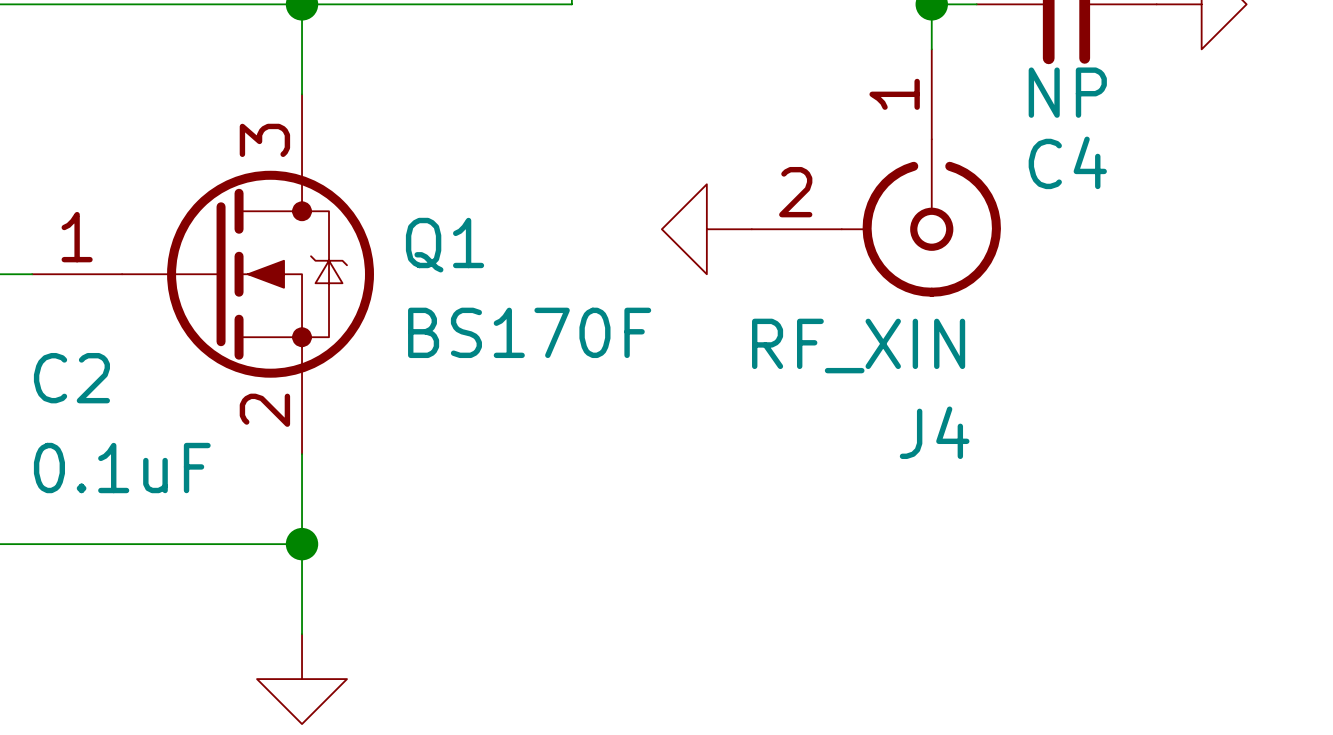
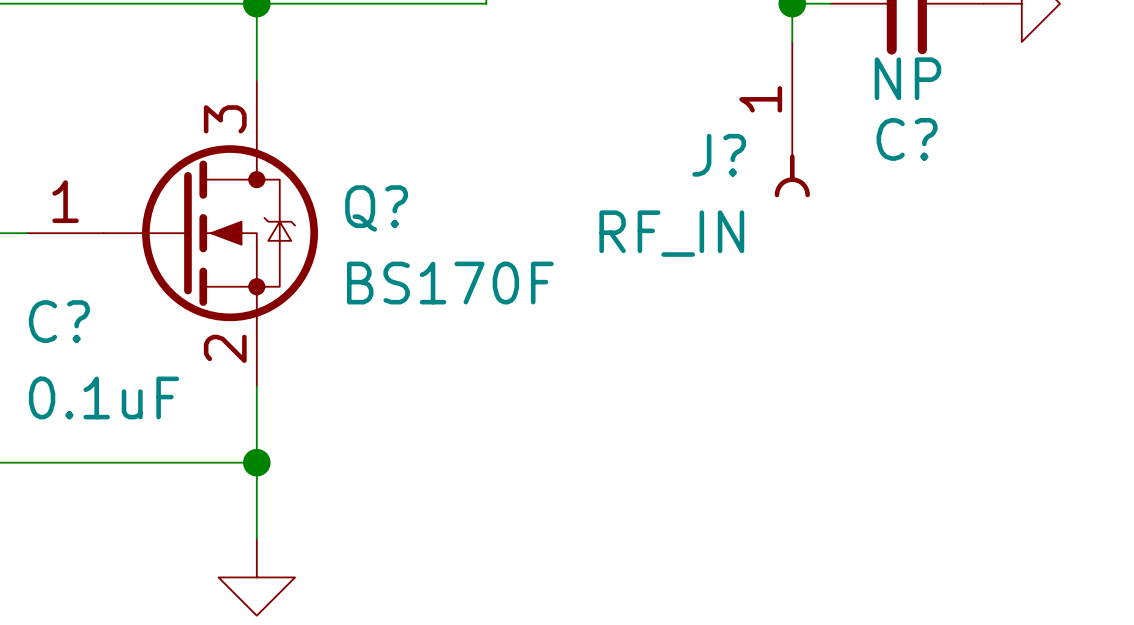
J?: none -> RF_IN (792, 119)
C4 name: C4 (1067, 162) -> C? (907, 139)
J4: RF_XIN (876, 173) -> none
power symbol: (706, 229) -> none
Q1 name: Q1 (445, 245) -> Q? (376, 208)
C2 name: C2 (71, 378) -> C? (59, 321)

